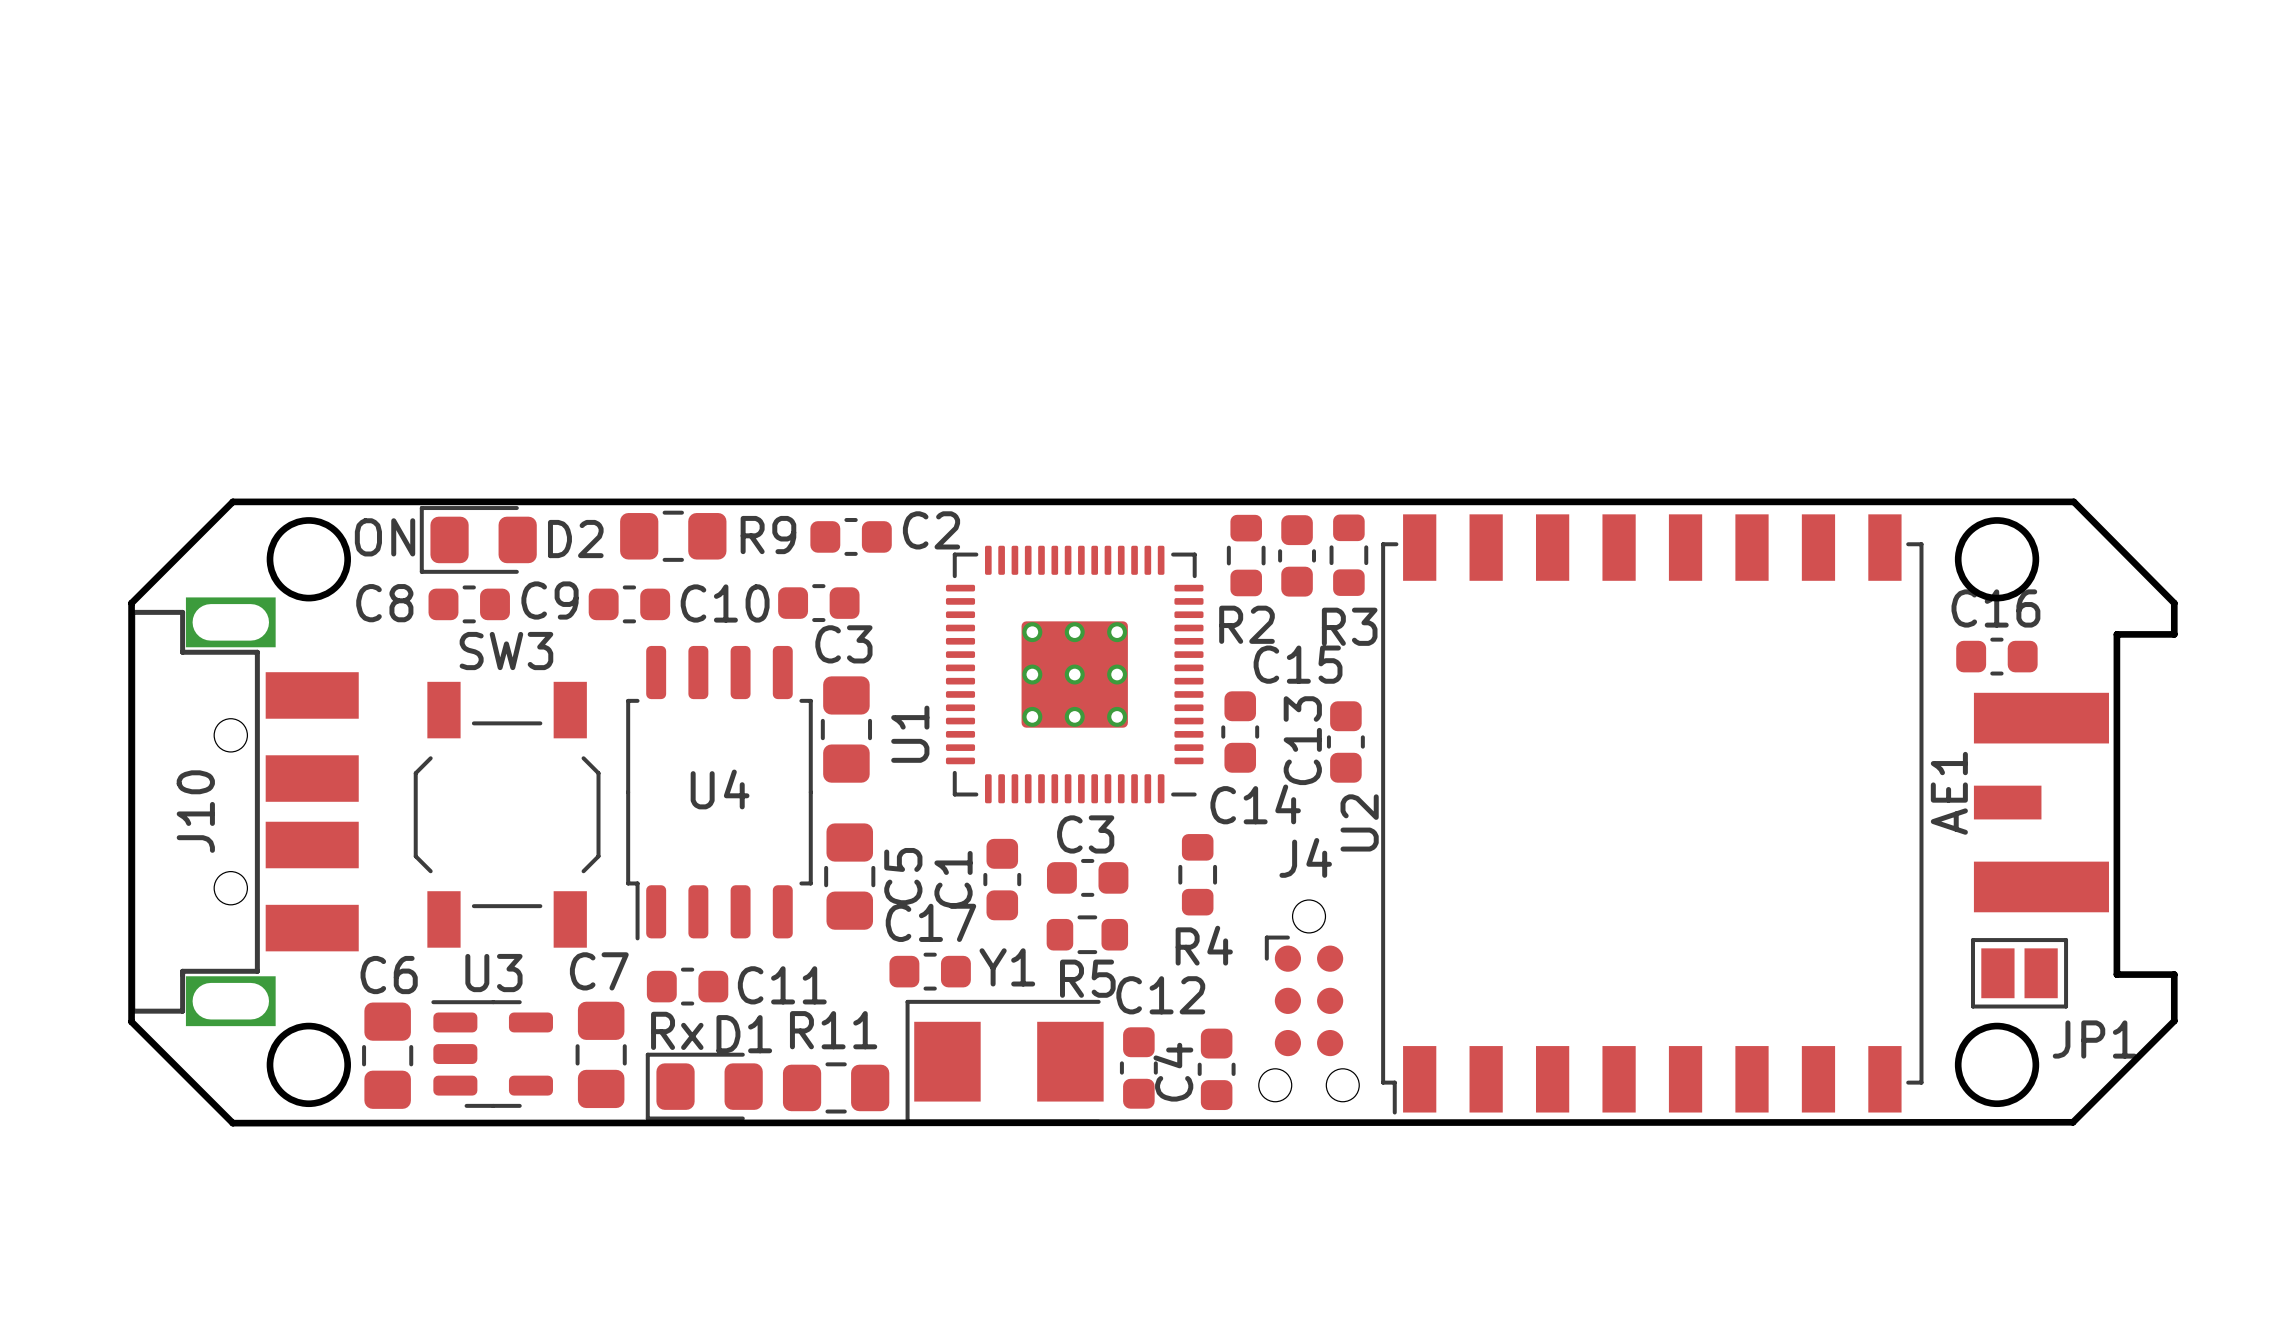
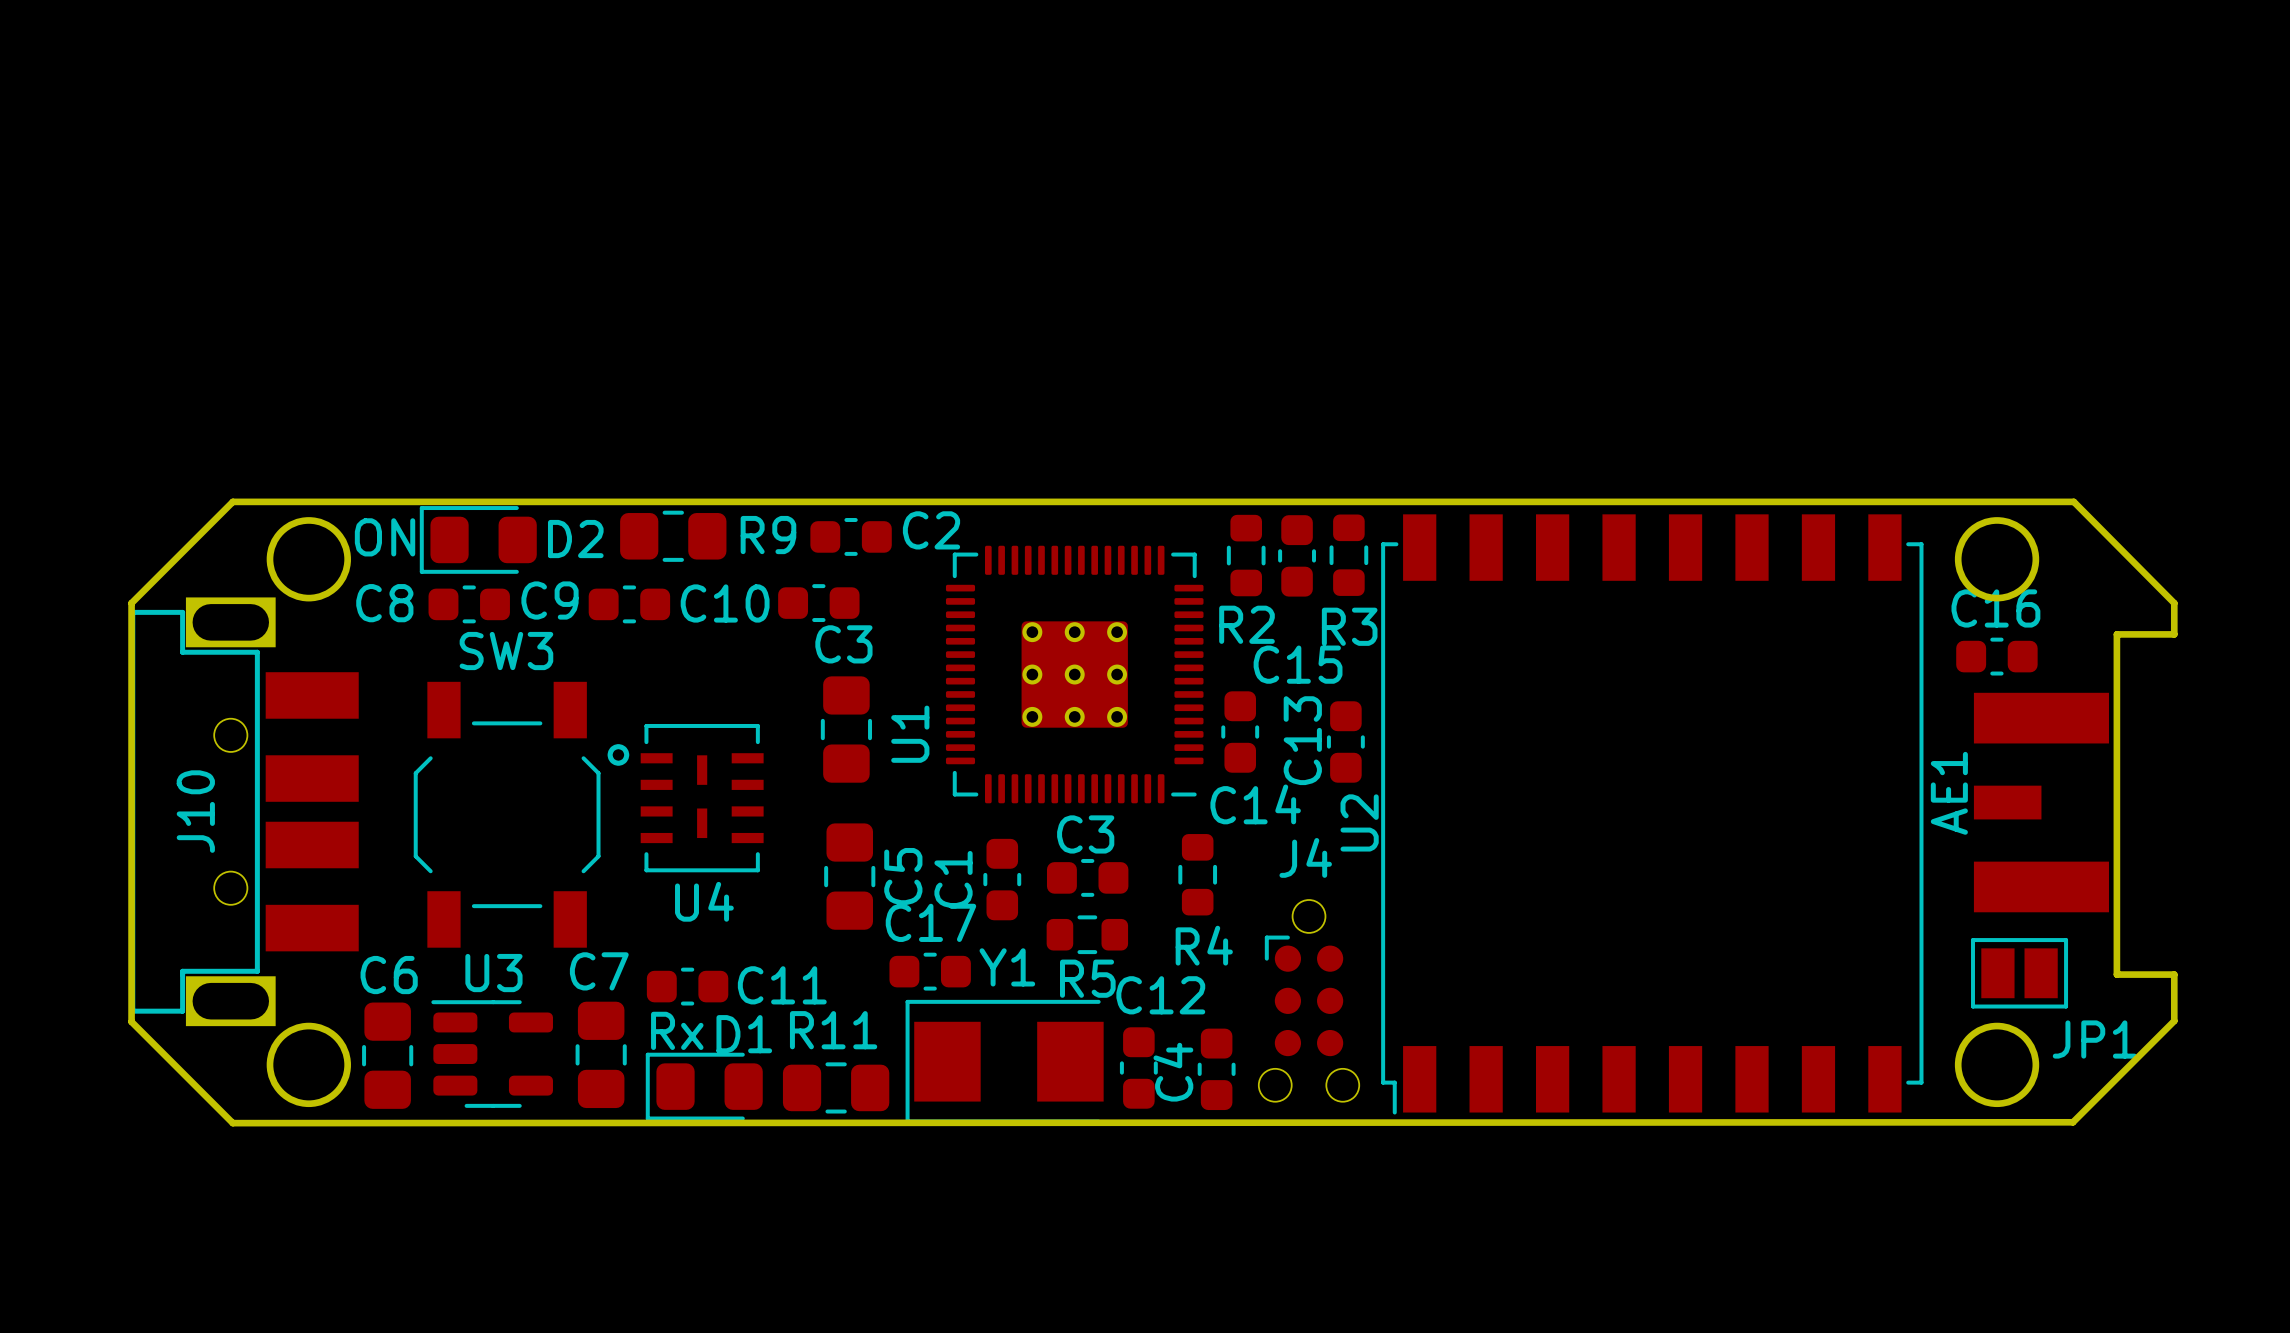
U4 footprint: [626, 645, 813, 941] -> [607, 723, 764, 873]
U4 name position: U4 (720, 789) -> U4 (704, 901)

